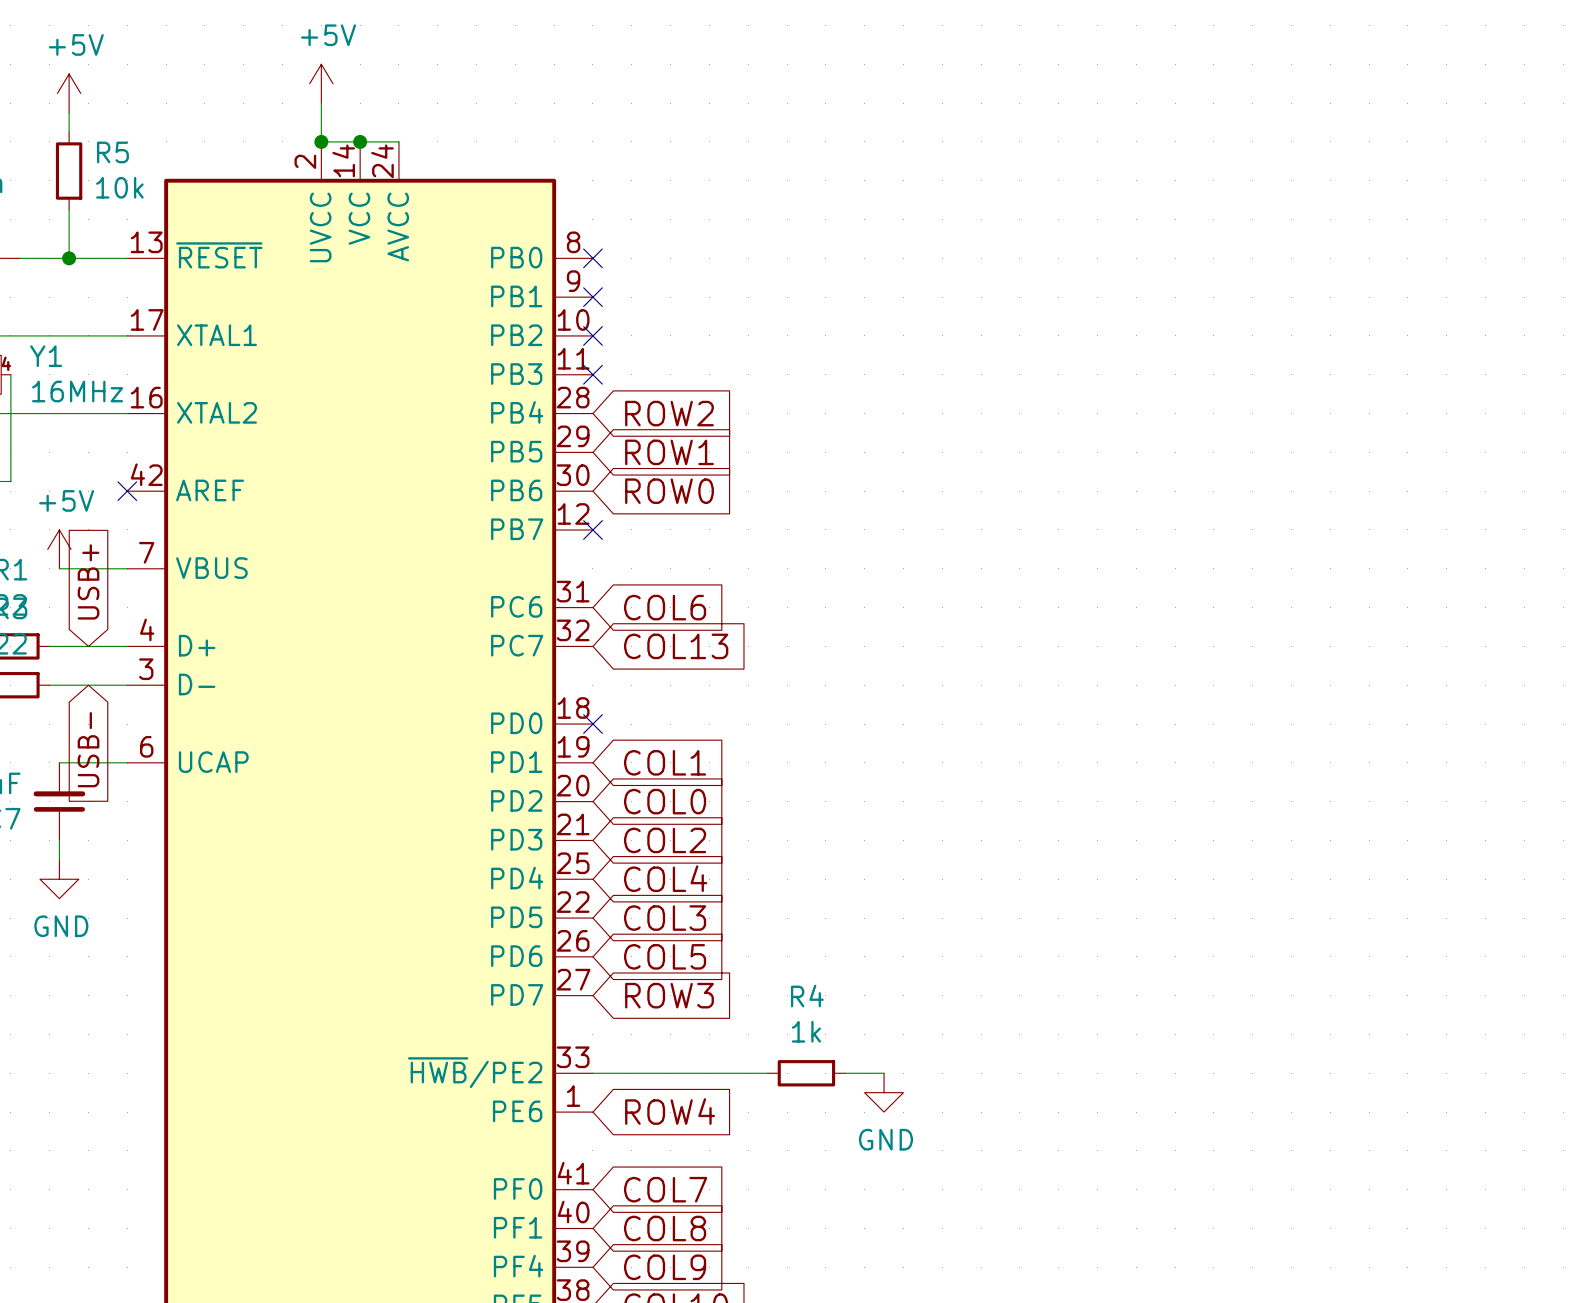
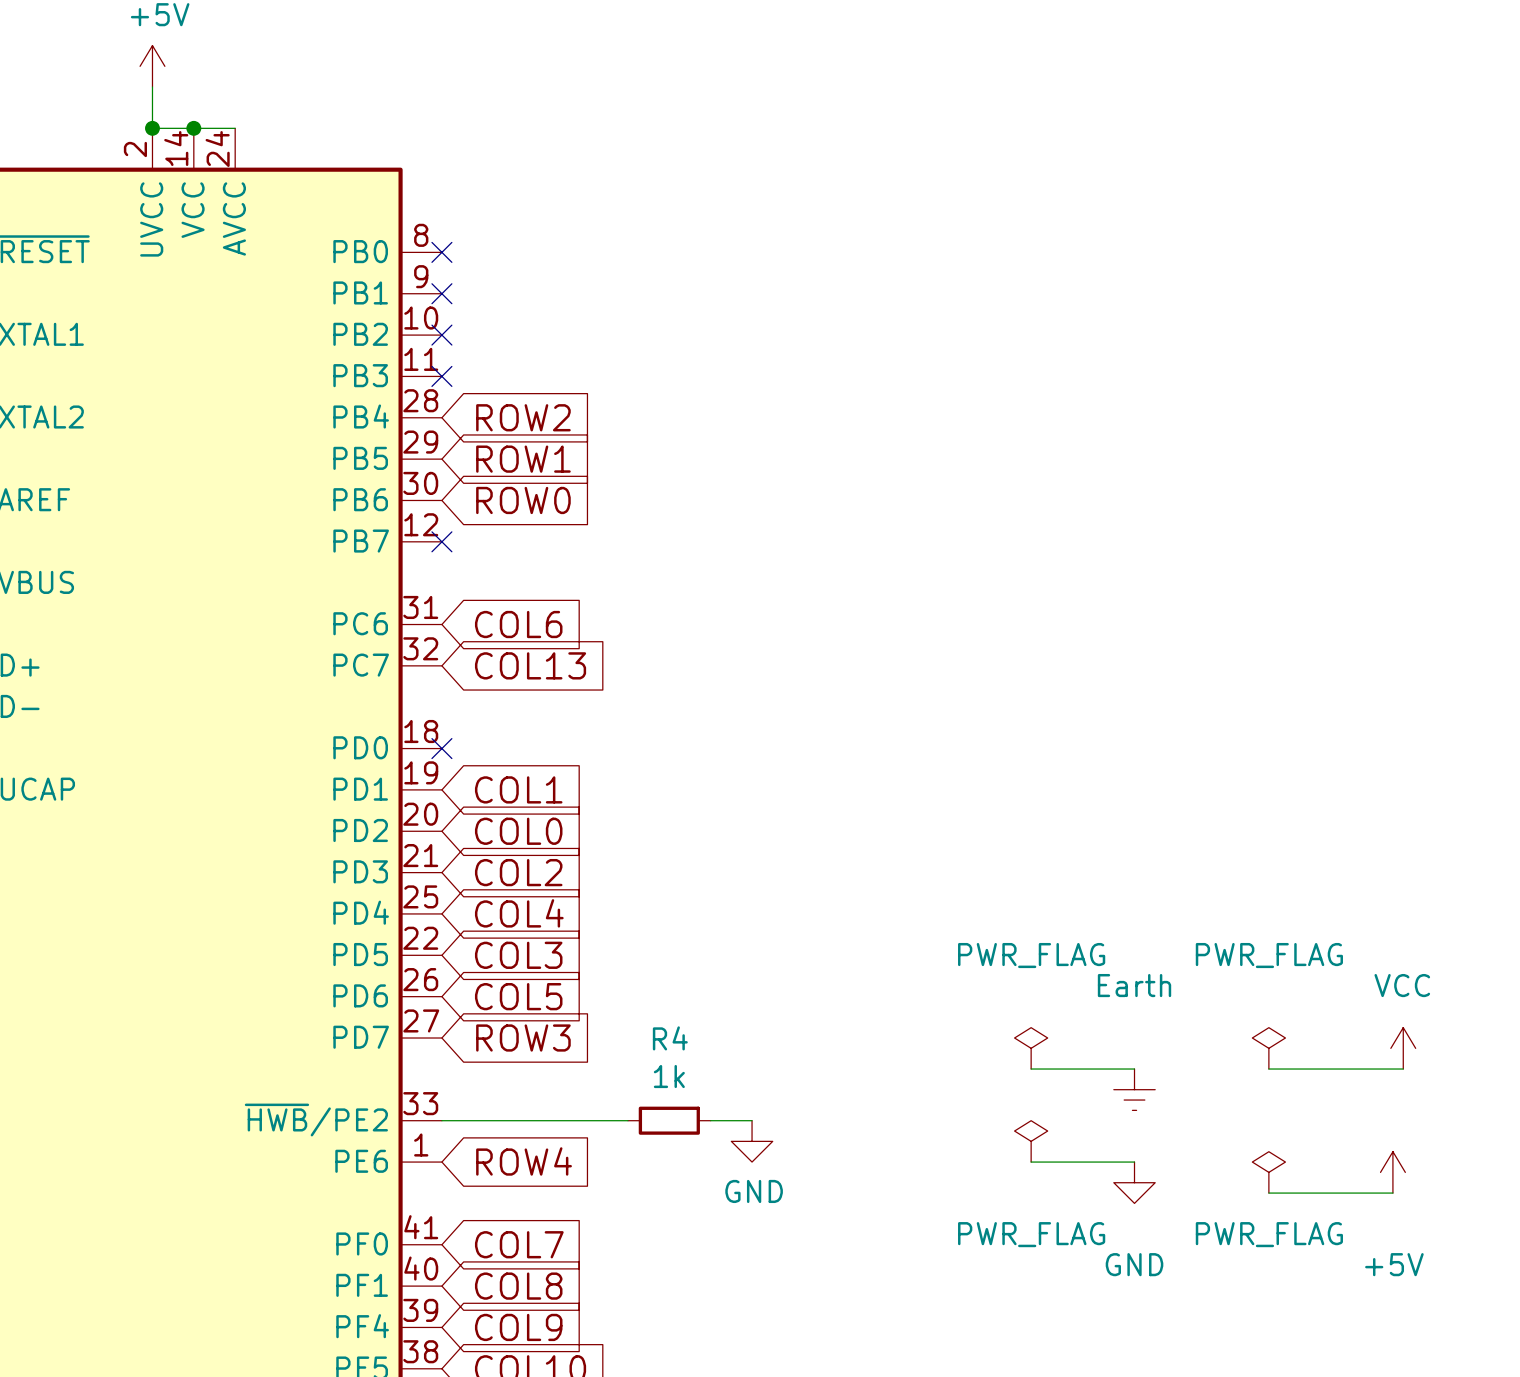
power symbol: none -> PWR_FLAG (1031, 1048)
power symbol: none -> PWR_FLAG (1268, 1048)
power symbol: none -> VCC (1403, 1048)
wire: none -> (1031, 1069) (1134, 1069)
wire: none -> (1268, 1069) (1403, 1069)
power symbol: none -> Earth (1134, 1089)
power symbol: none -> PWR_FLAG (1031, 1141)
wire: none -> (1031, 1162) (1134, 1162)
power symbol: none -> PWR_FLAG (1268, 1172)
power symbol: none -> +5V (1392, 1172)
power symbol: none -> GND (1134, 1182)
wire: none -> (1268, 1193) (1392, 1193)

